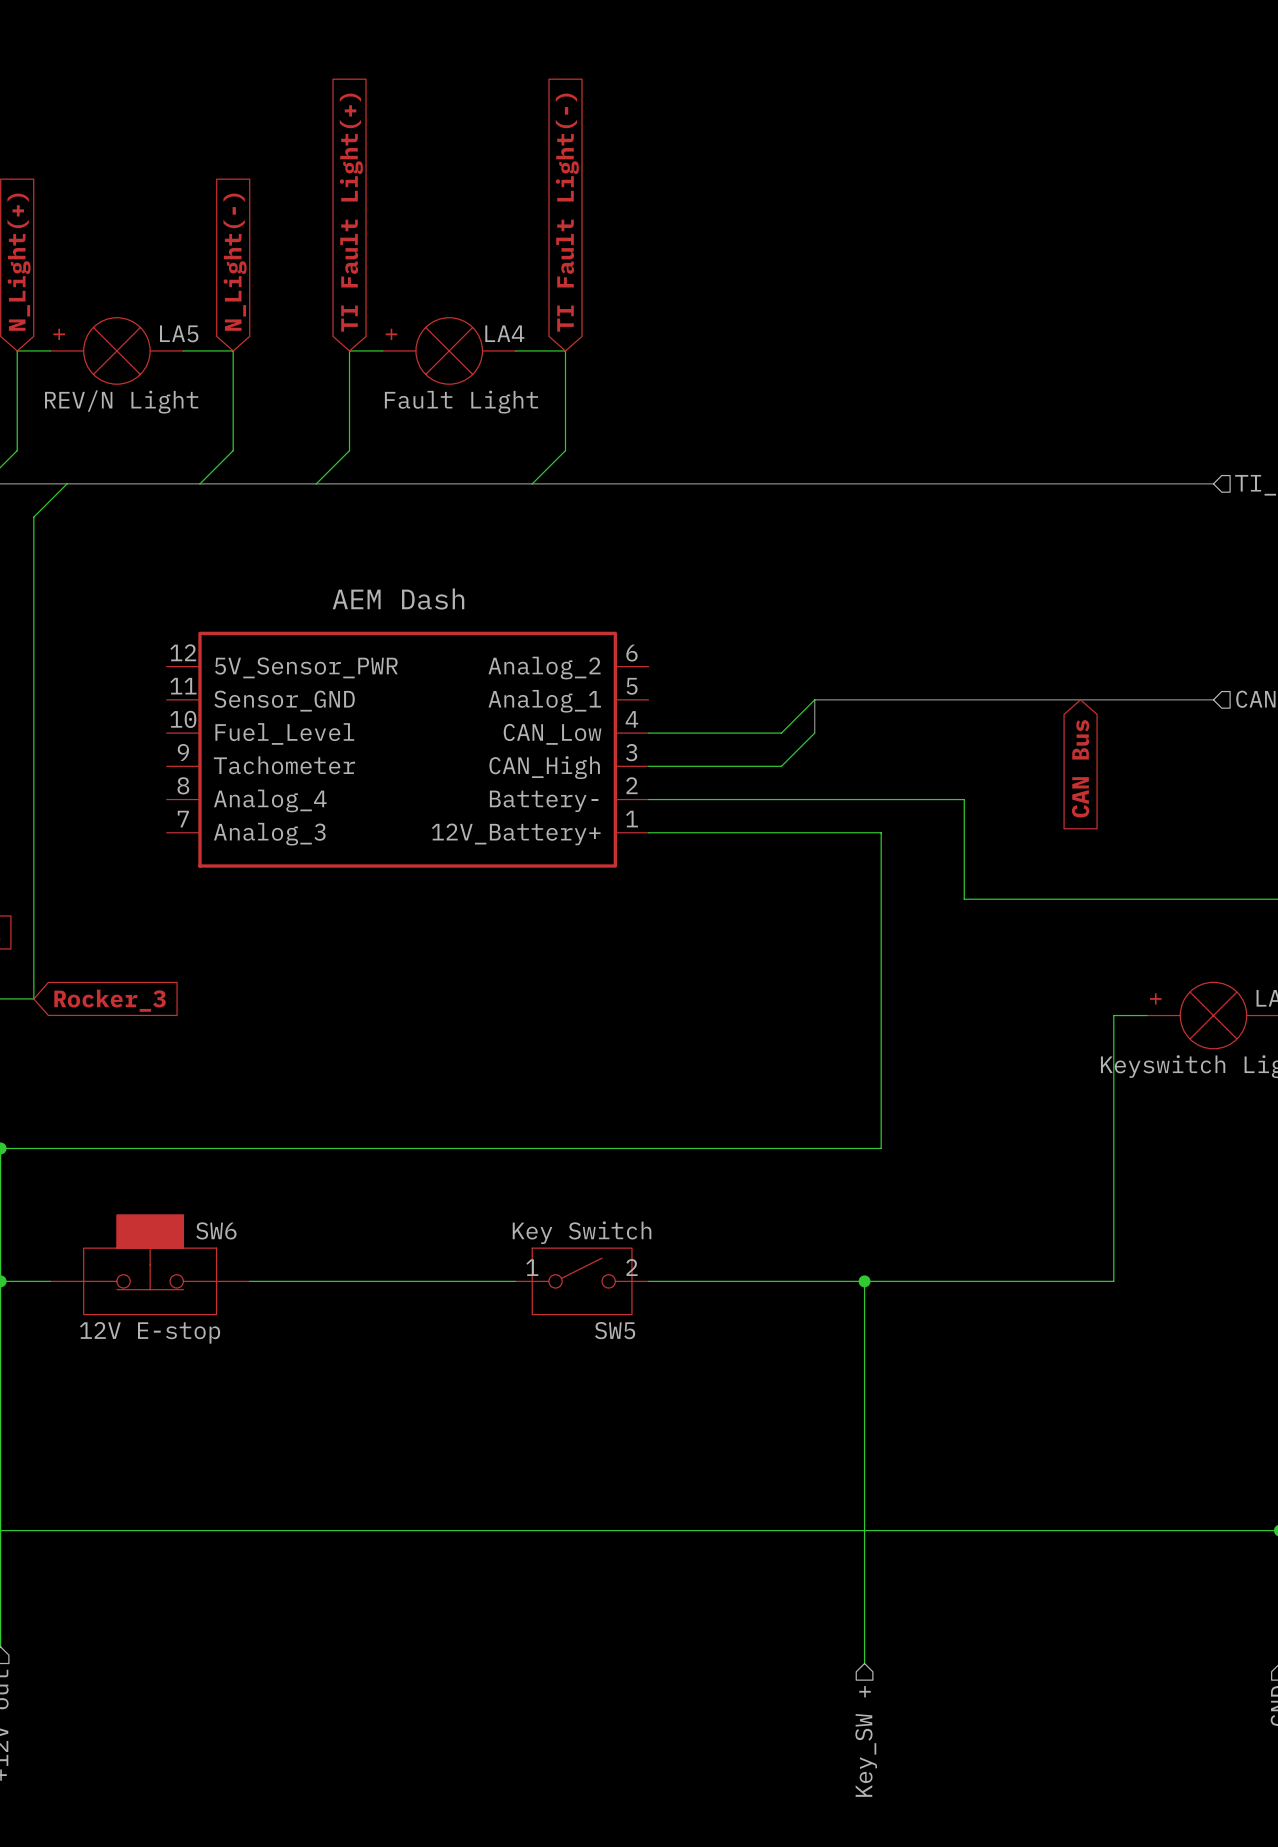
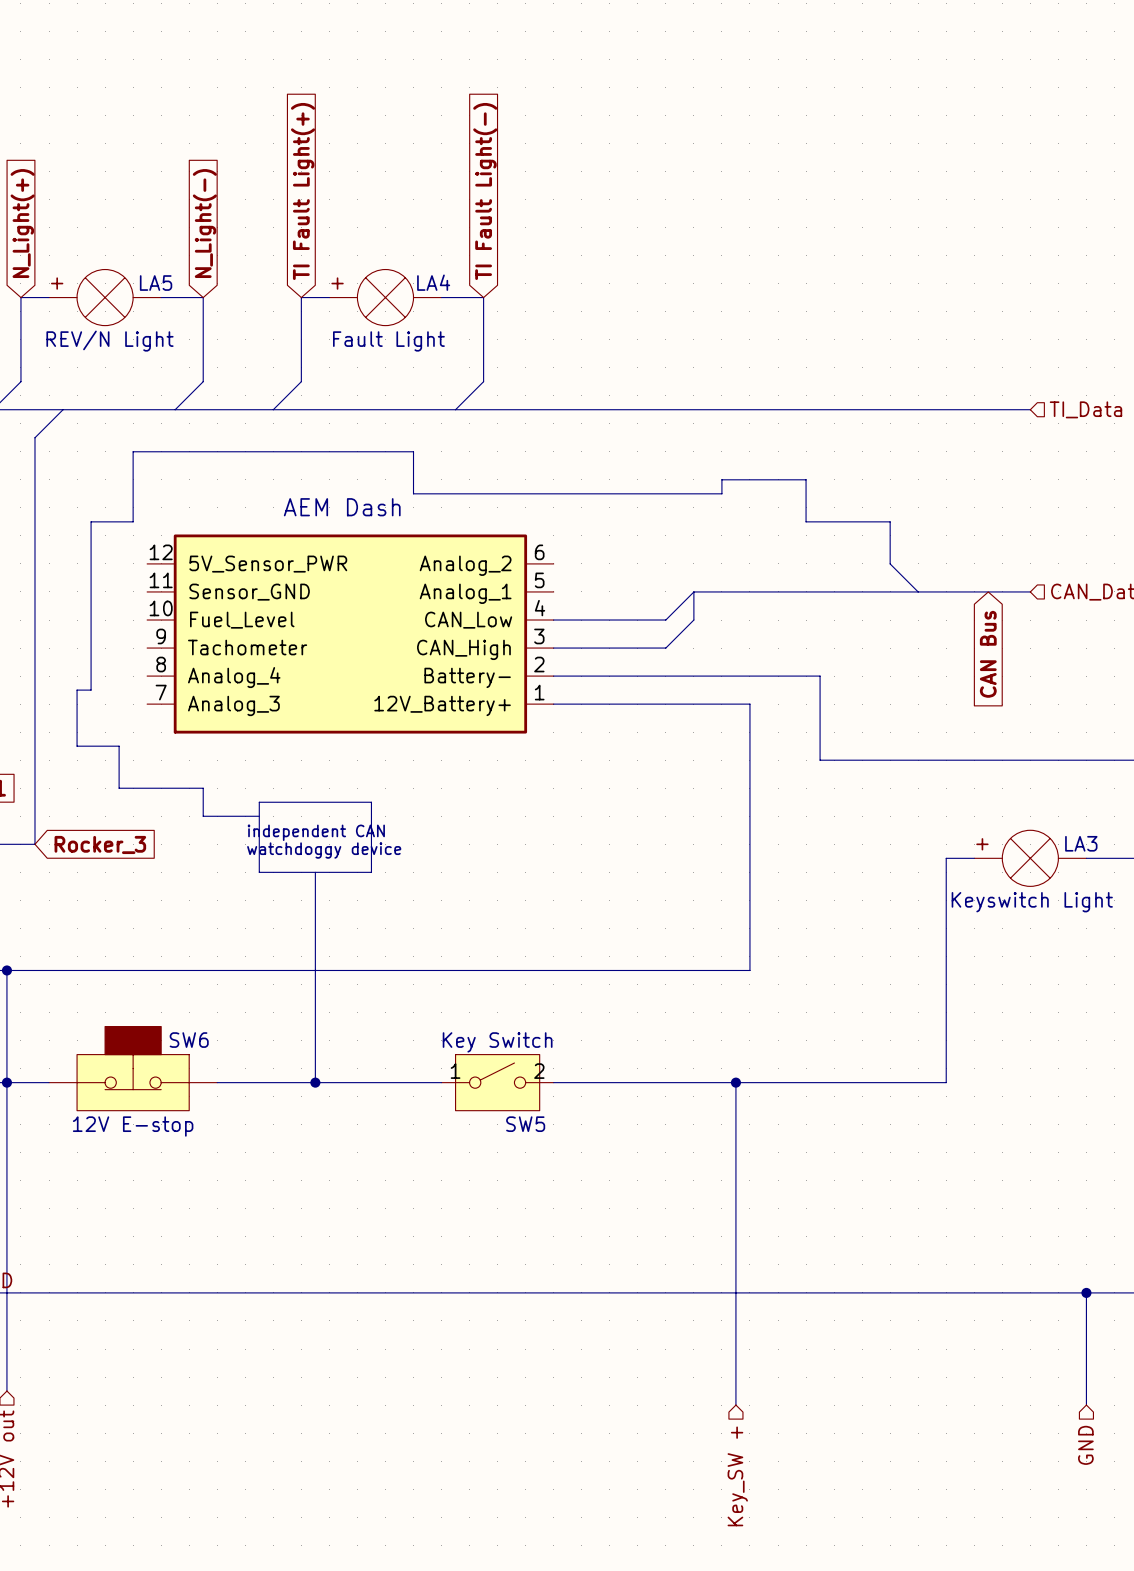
wire: none -> (918, 591) (890, 563) (890, 521) (806, 521) (806, 479) (721, 479) (721, 493) (413, 493) (413, 451) (133, 451) (133, 521) (91, 521) (91, 690) (77, 690) (77, 746) (119, 746) (119, 788) (203, 788) (203, 816) (259, 816)
global label position: CAN Bus (1080, 768) -> CAN Bus (988, 654)
line: none -> (259, 802) (371, 802) (371, 872) (259, 872) (259, 802)
text: none -> independent CAN (316, 832)
text: none -> watchdoggy device (324, 850)
wire: none -> (315, 872) (315, 1082)
junction: none -> (315, 1082)

